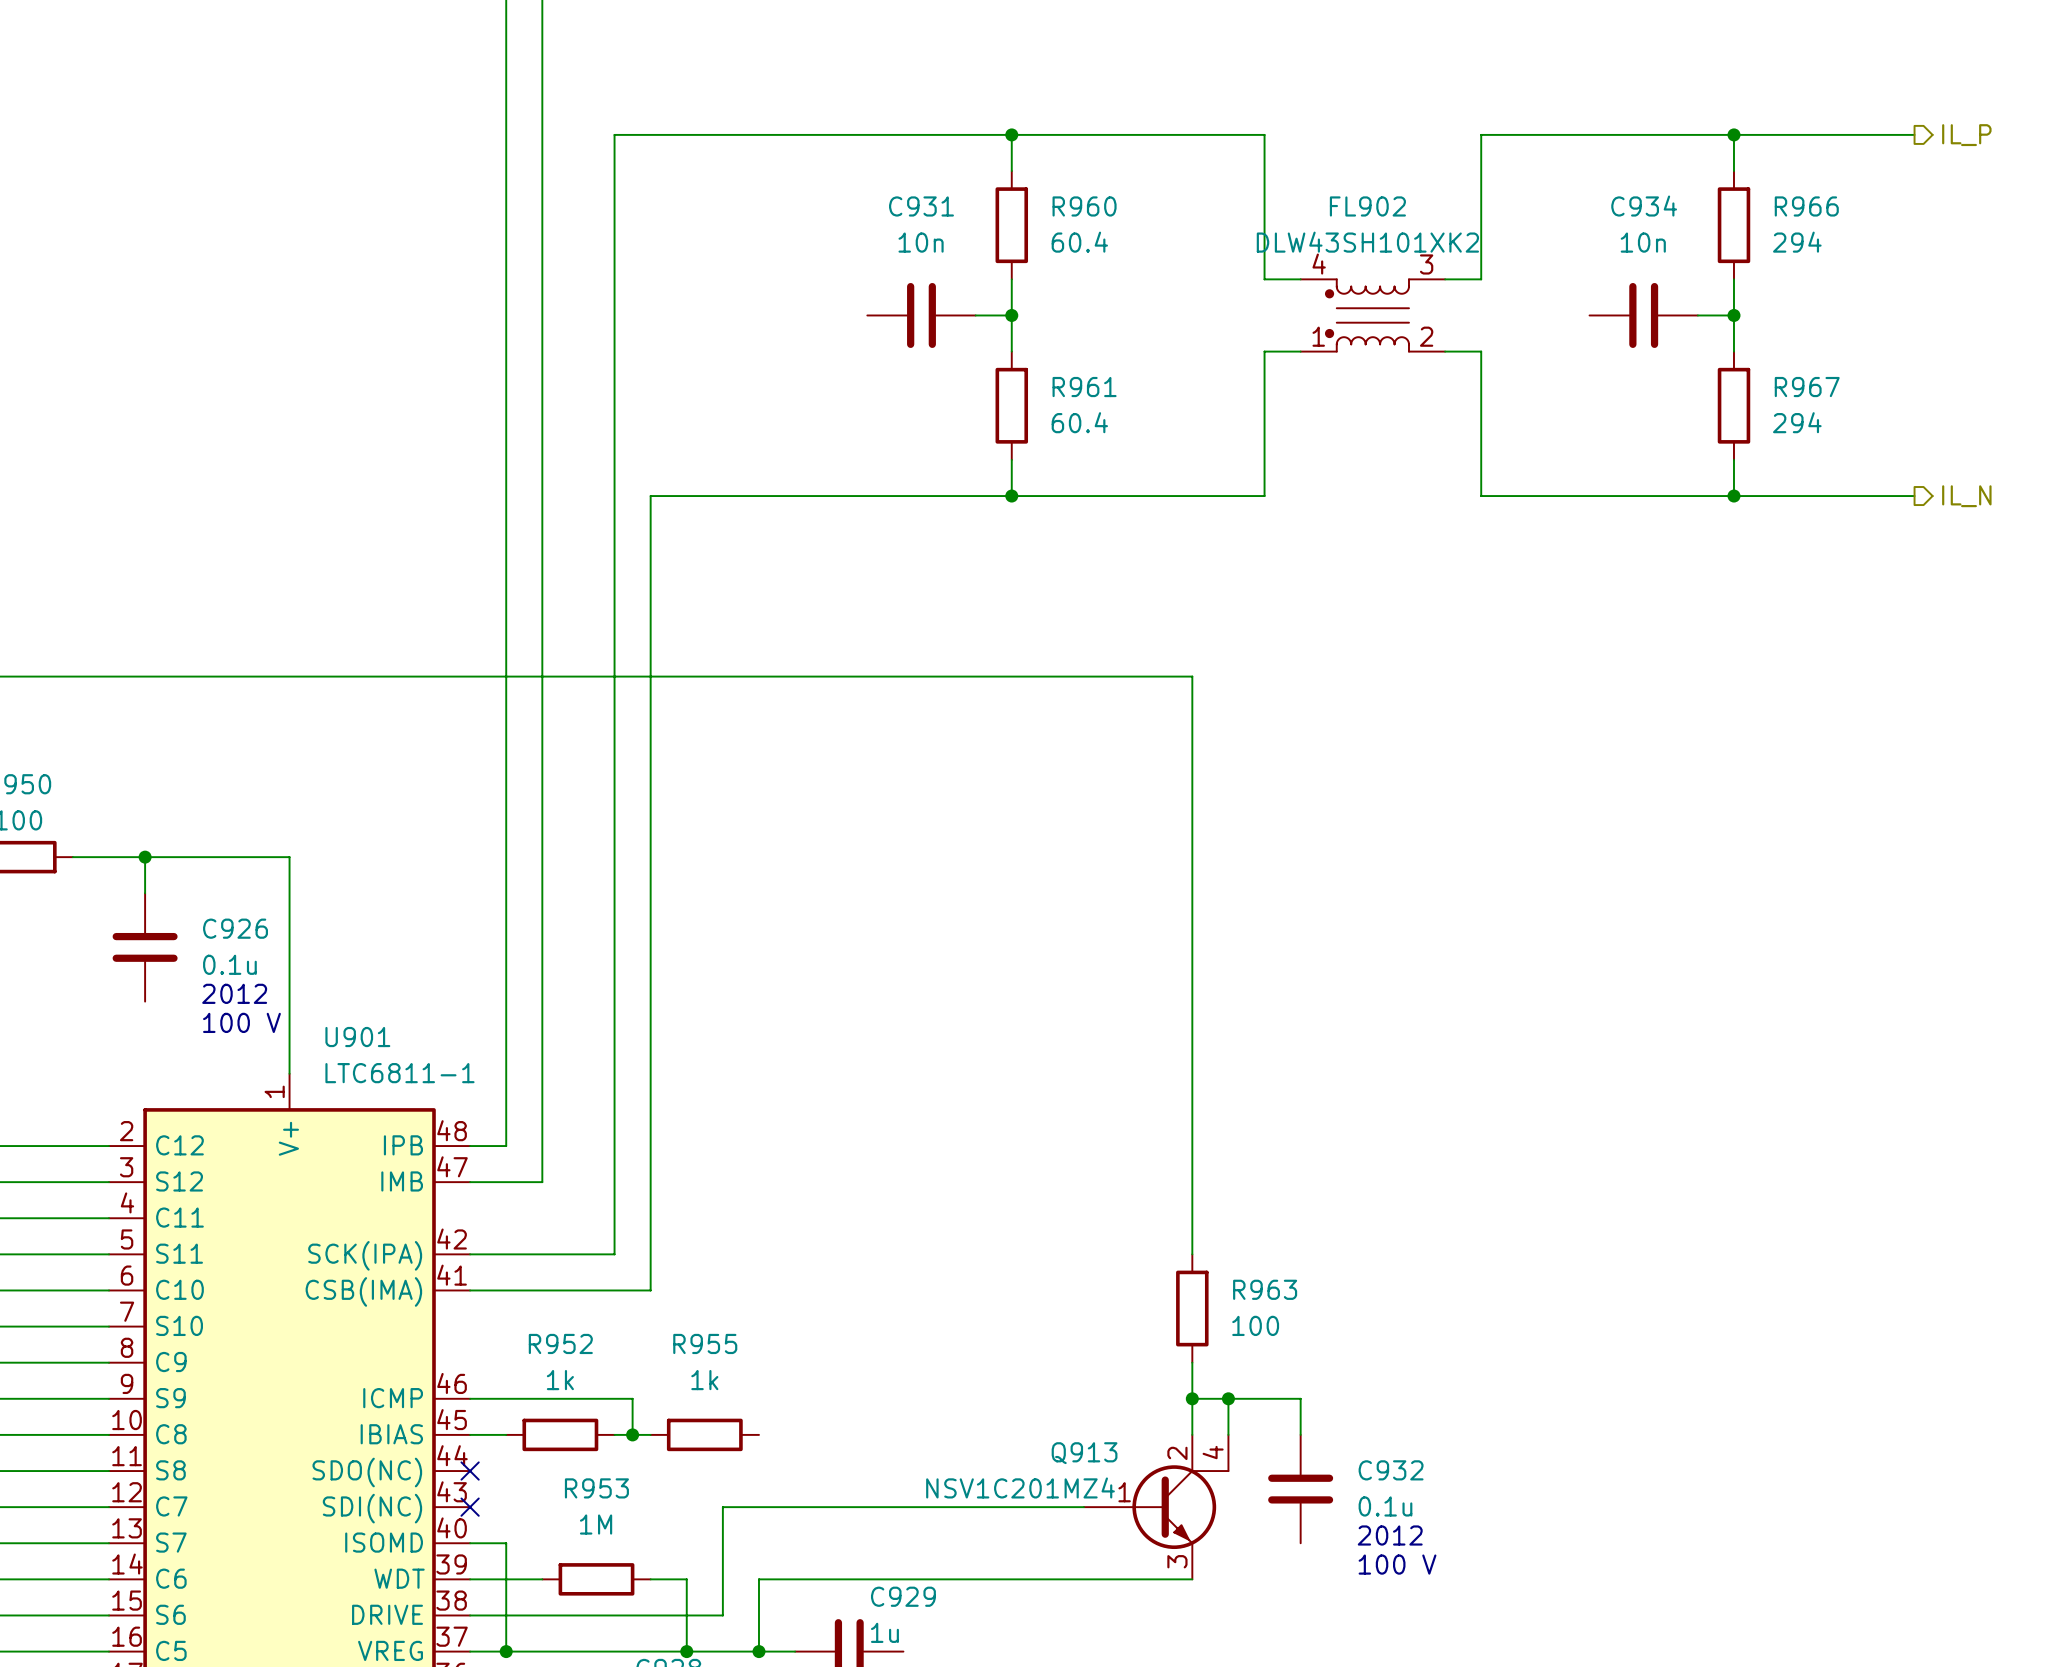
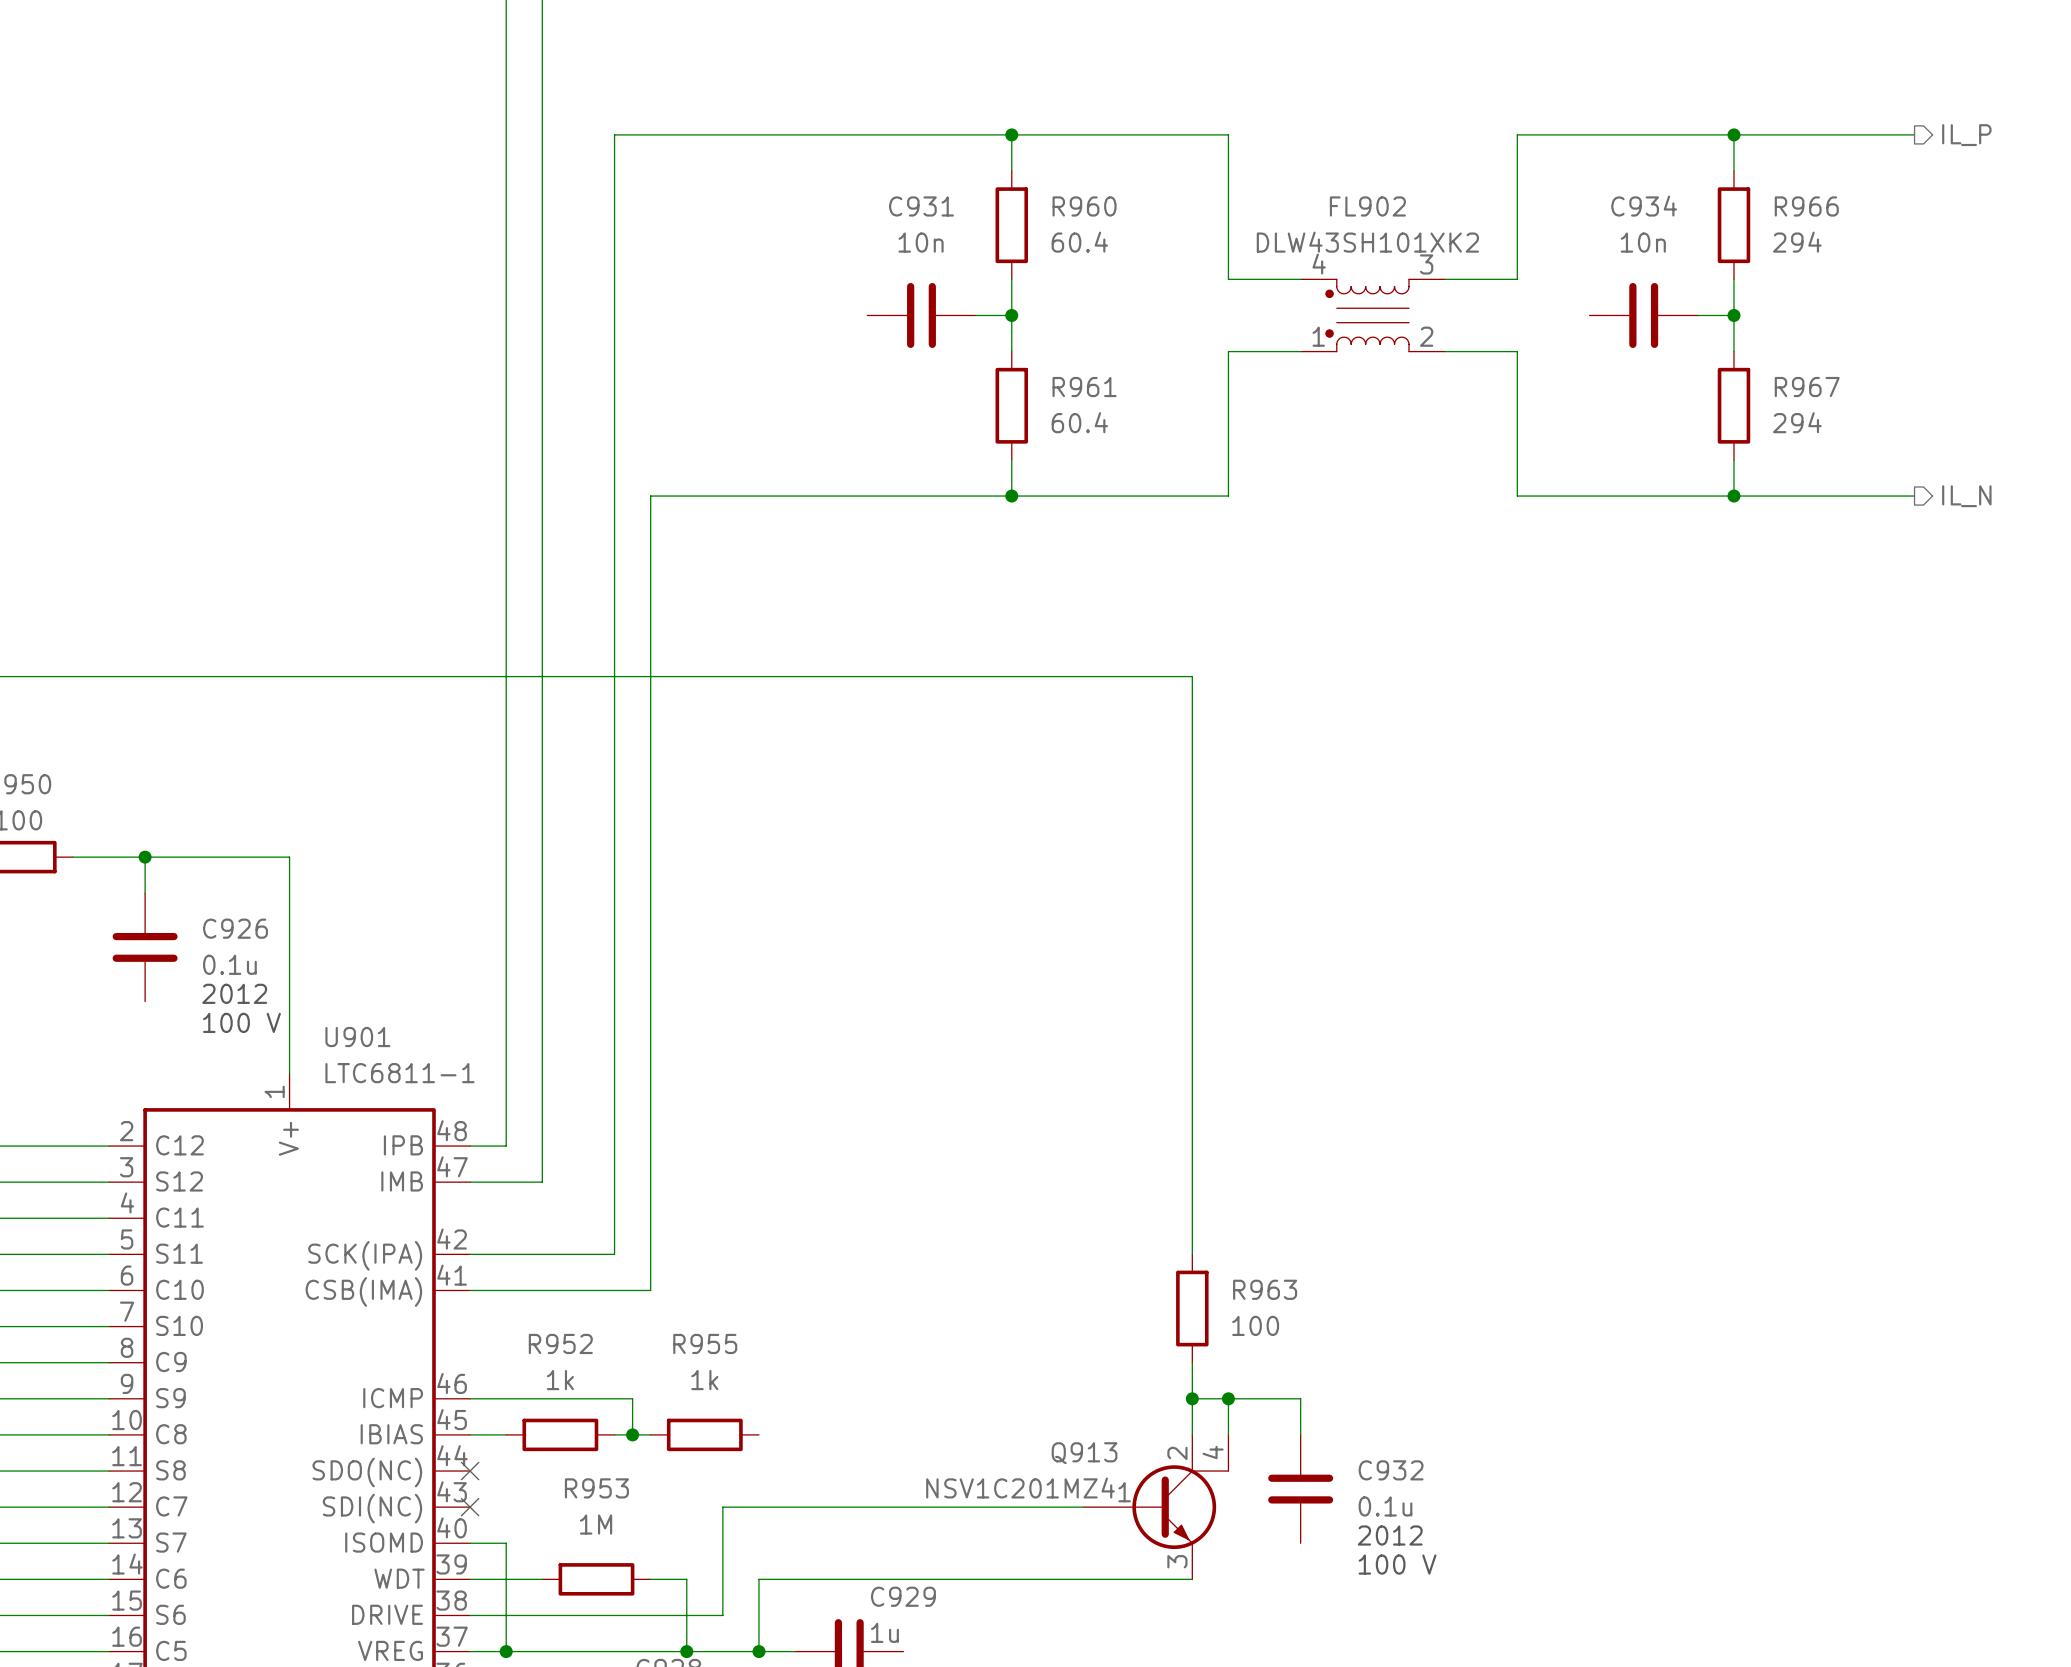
wire: (1228, 134) (1264, 134) (1264, 279) -> (1228, 134) (1228, 279) (1264, 279)
wire: (1517, 134) (1481, 134) (1481, 279) -> (1517, 134) (1517, 279) (1481, 279)
wire: (1264, 351) (1264, 496) (1228, 496) -> (1264, 351) (1228, 351) (1228, 496)
wire: (1481, 351) (1481, 496) (1517, 496) -> (1481, 351) (1517, 351) (1517, 496)

